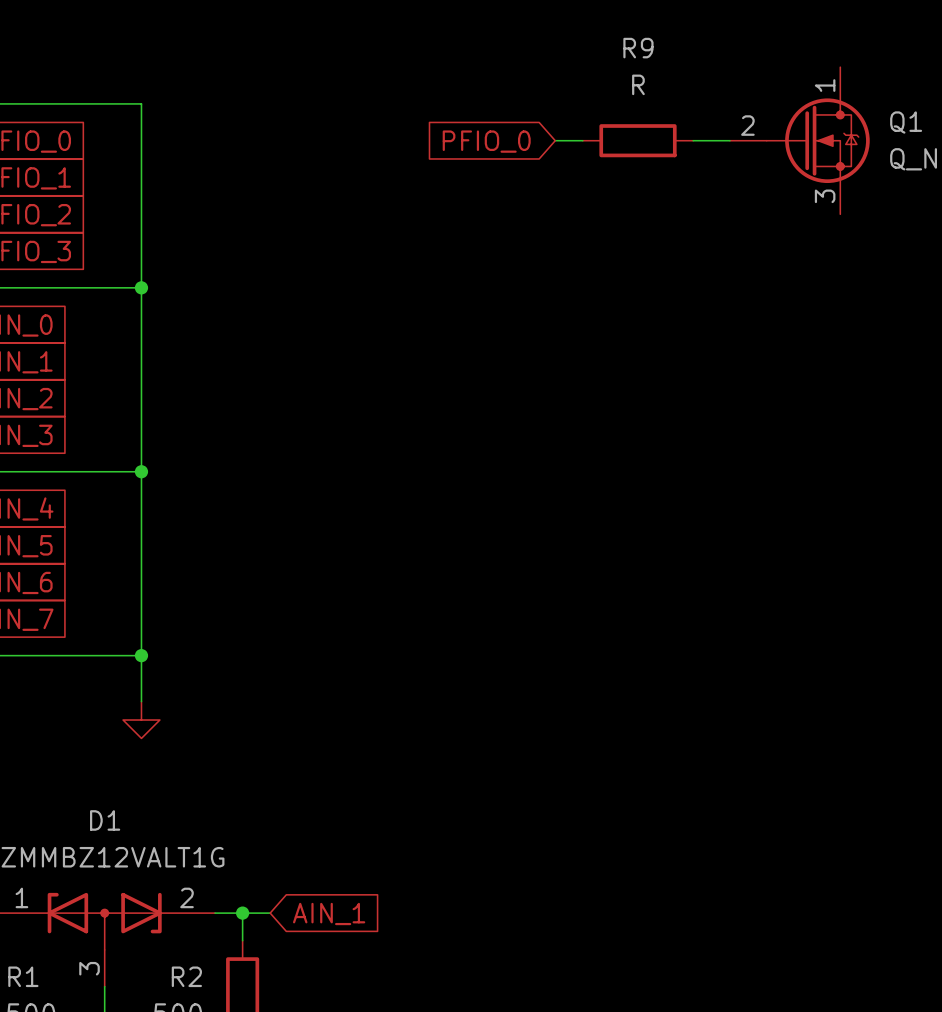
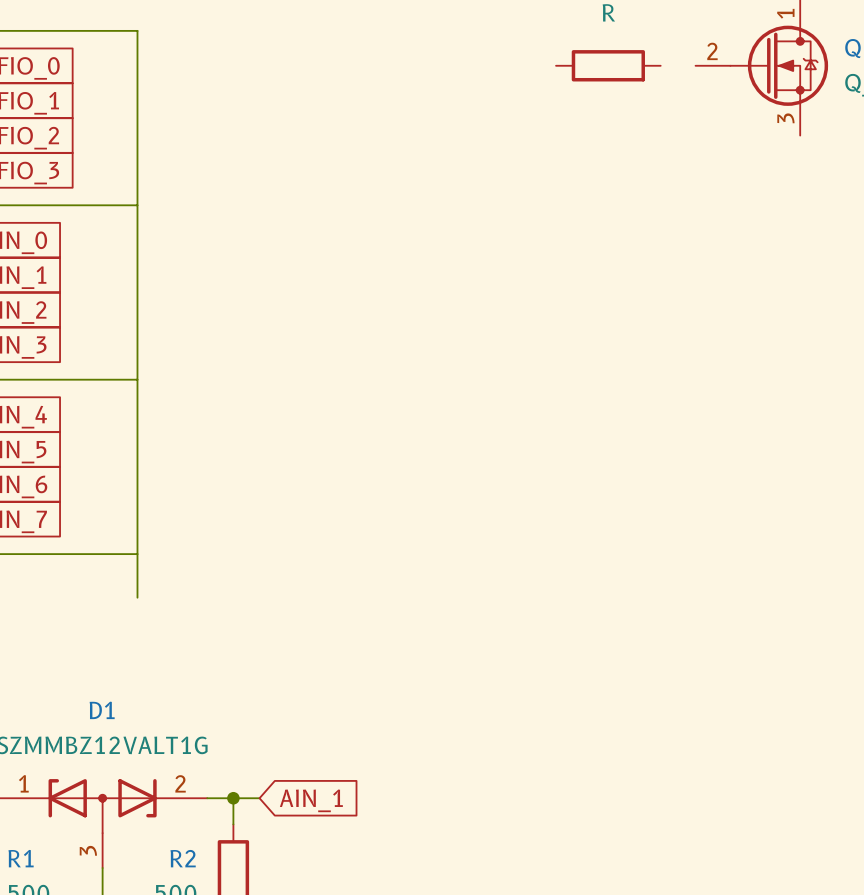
wire: (555, 140) (582, 140) -> none
wire: (693, 140) (729, 140) -> none
global label: PFIO_0 (486, 141) -> none
junction: (141, 287) -> none
junction: (141, 471) -> none
junction: (141, 655) -> none
power symbol: (141, 720) -> none

